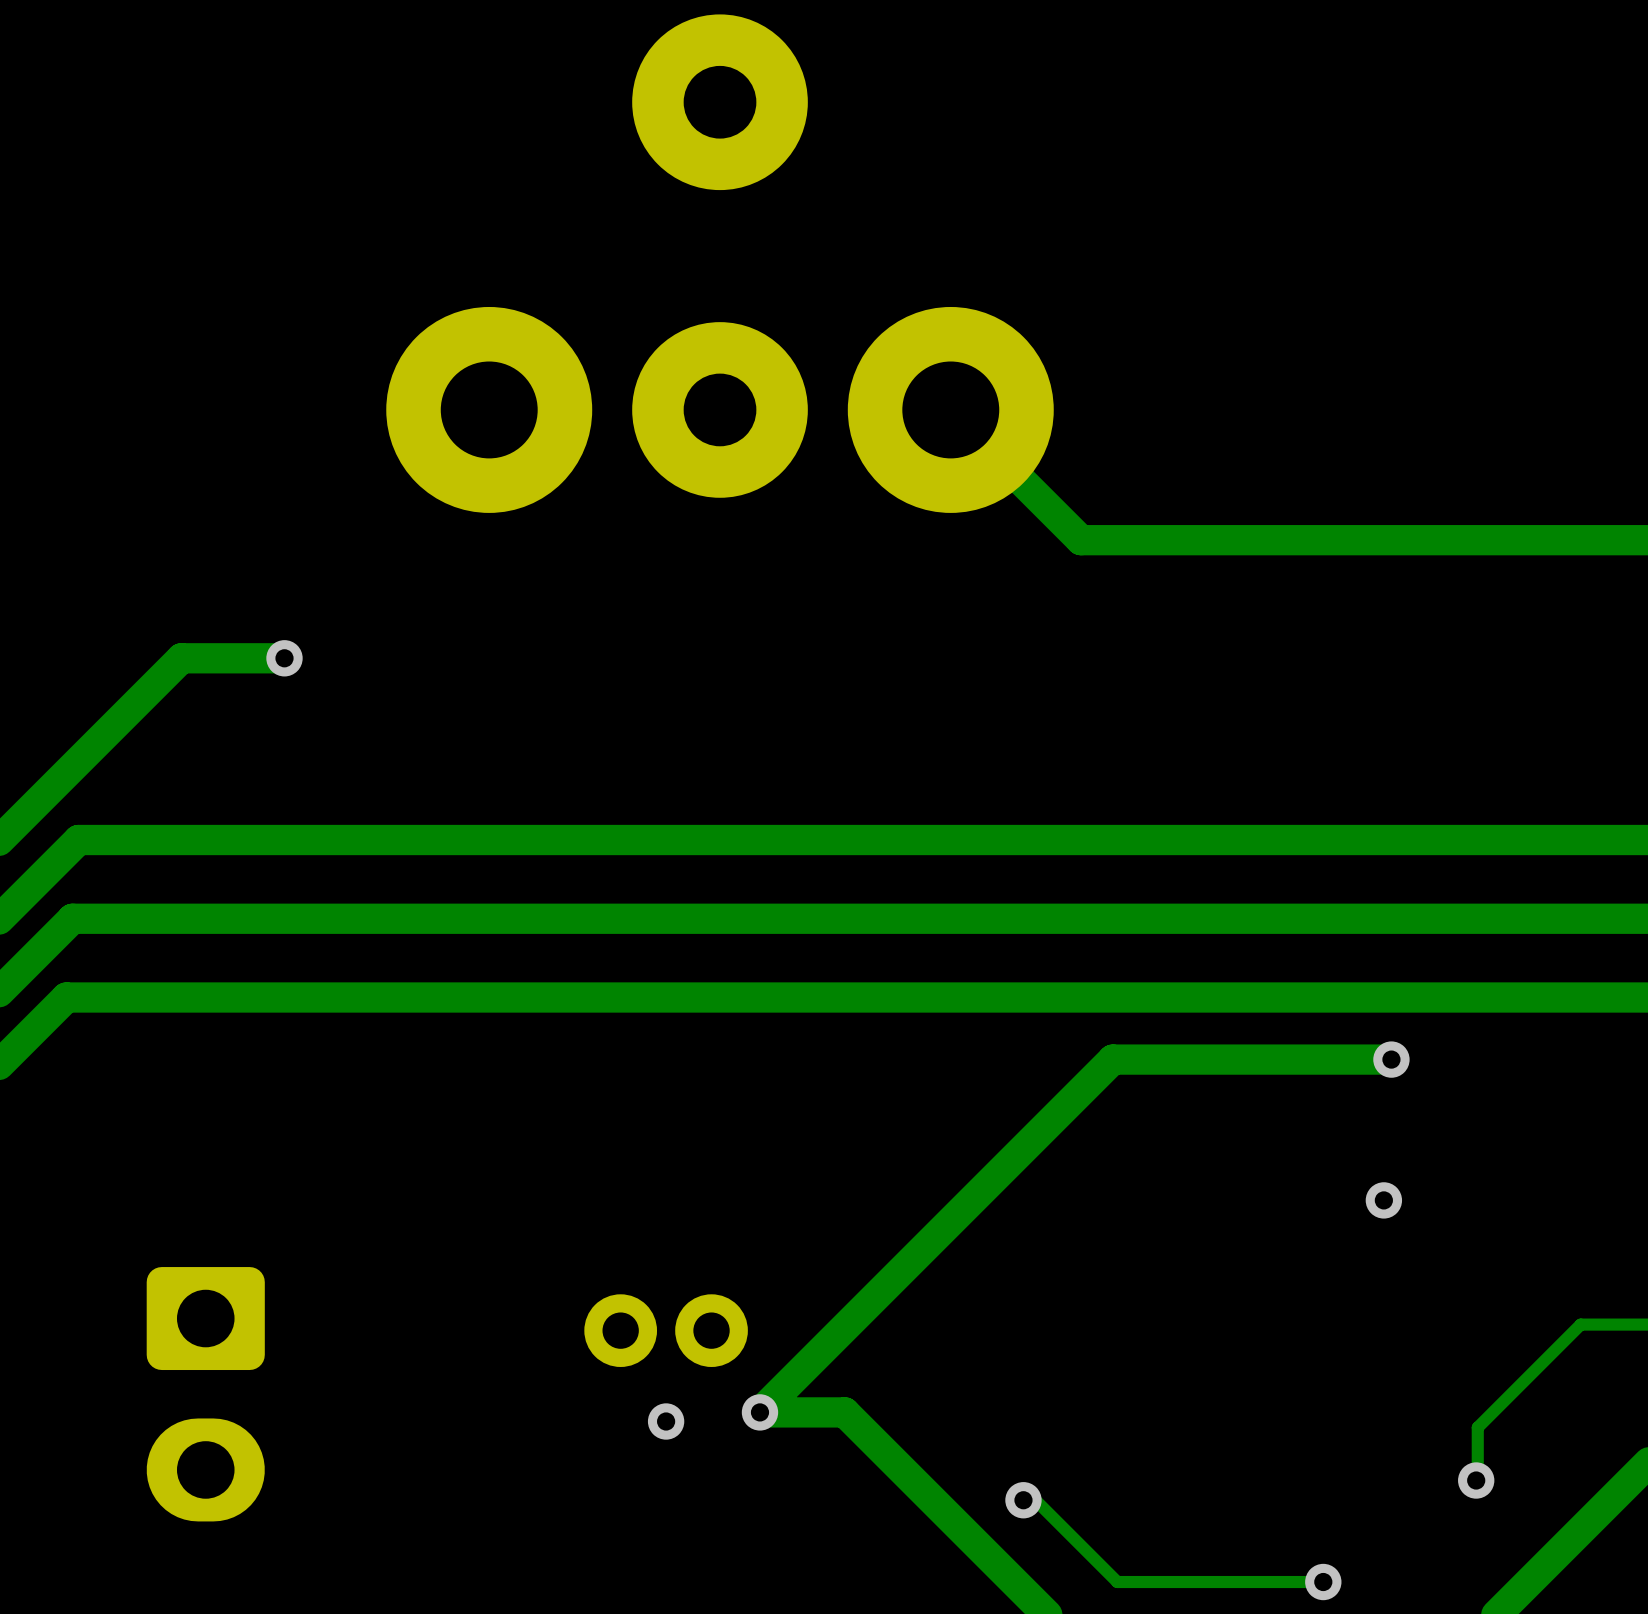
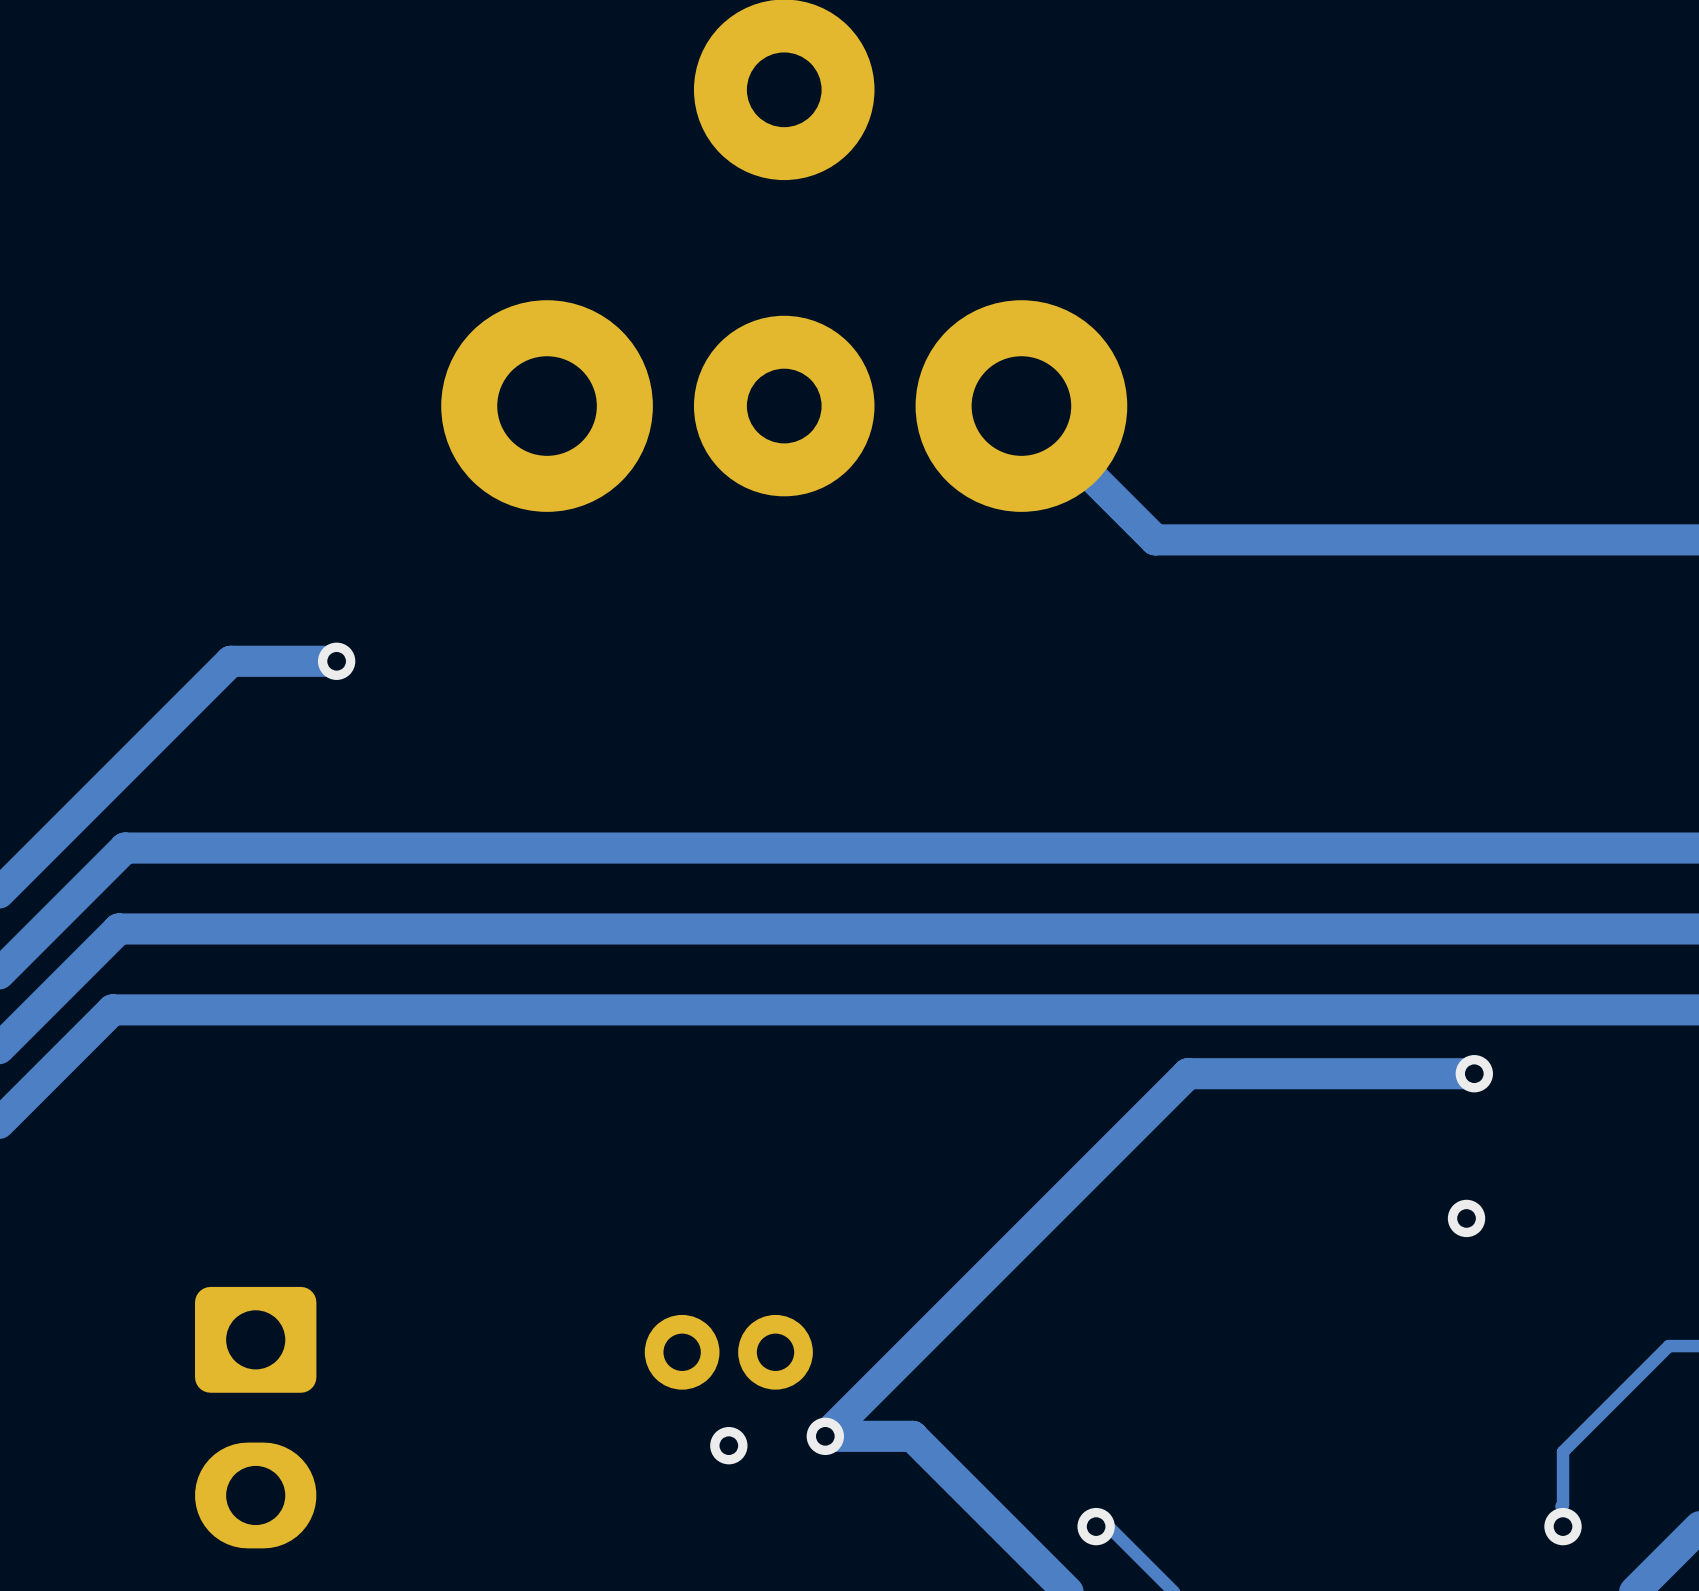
via position: (1476, 1480) -> (1563, 1526)

